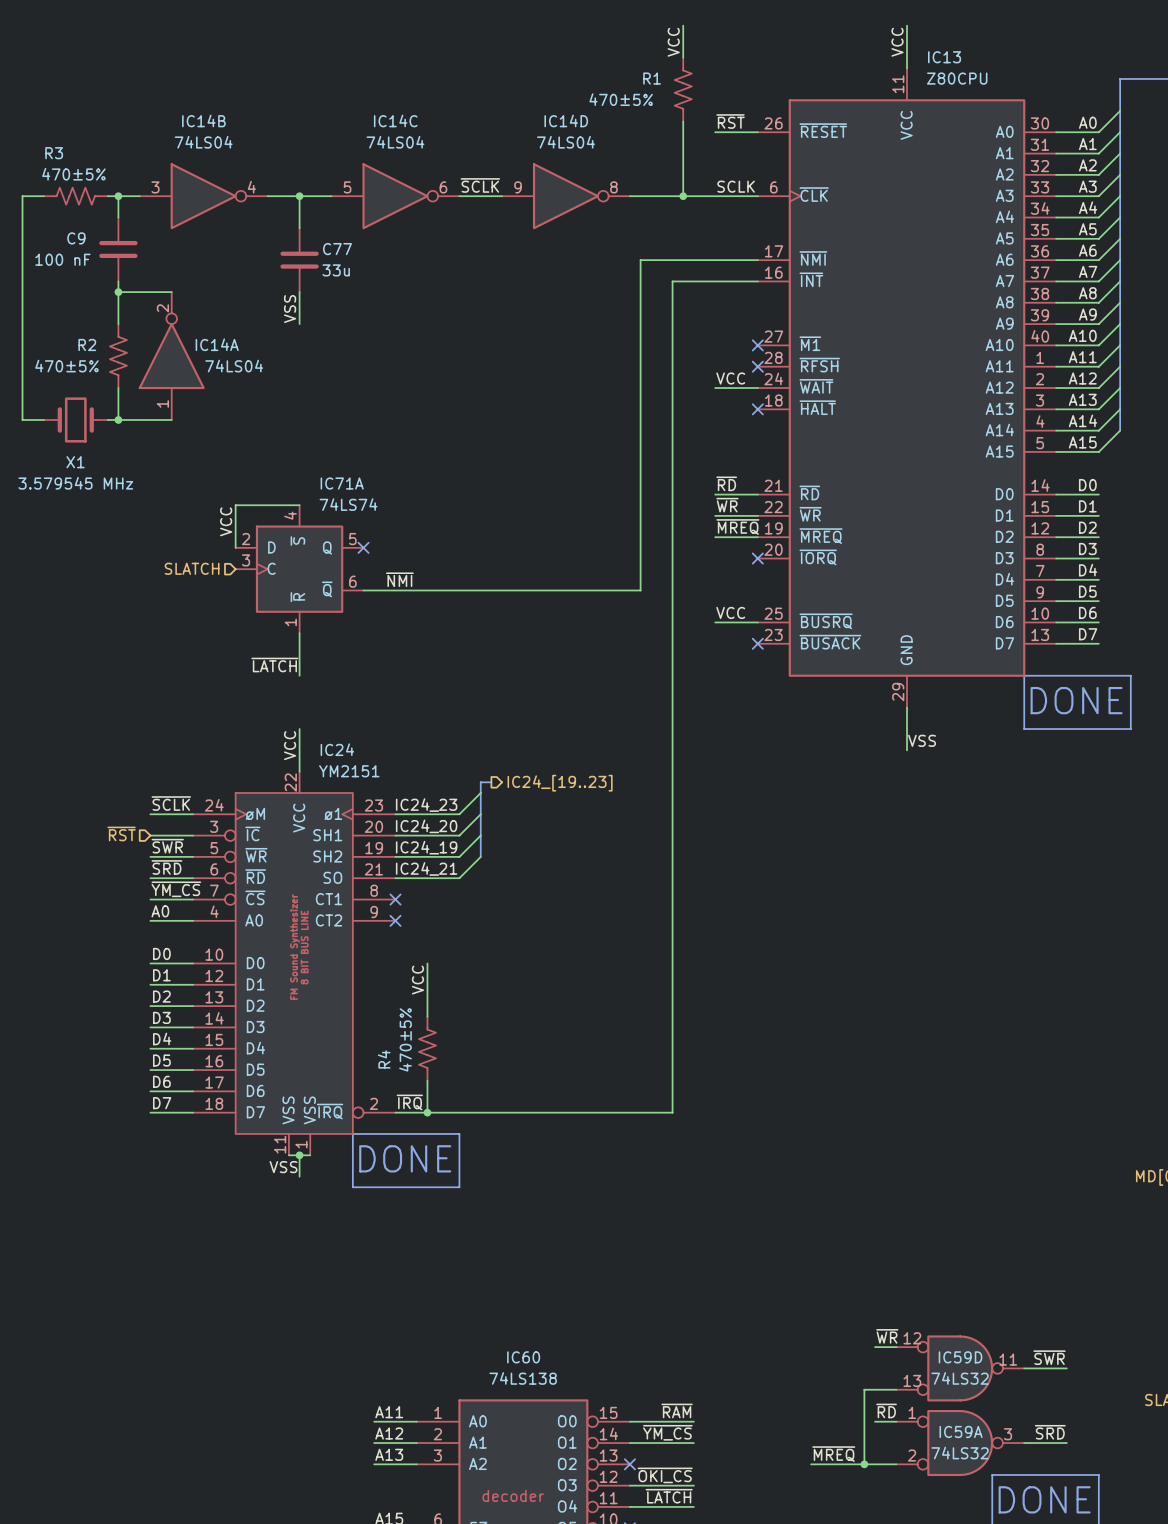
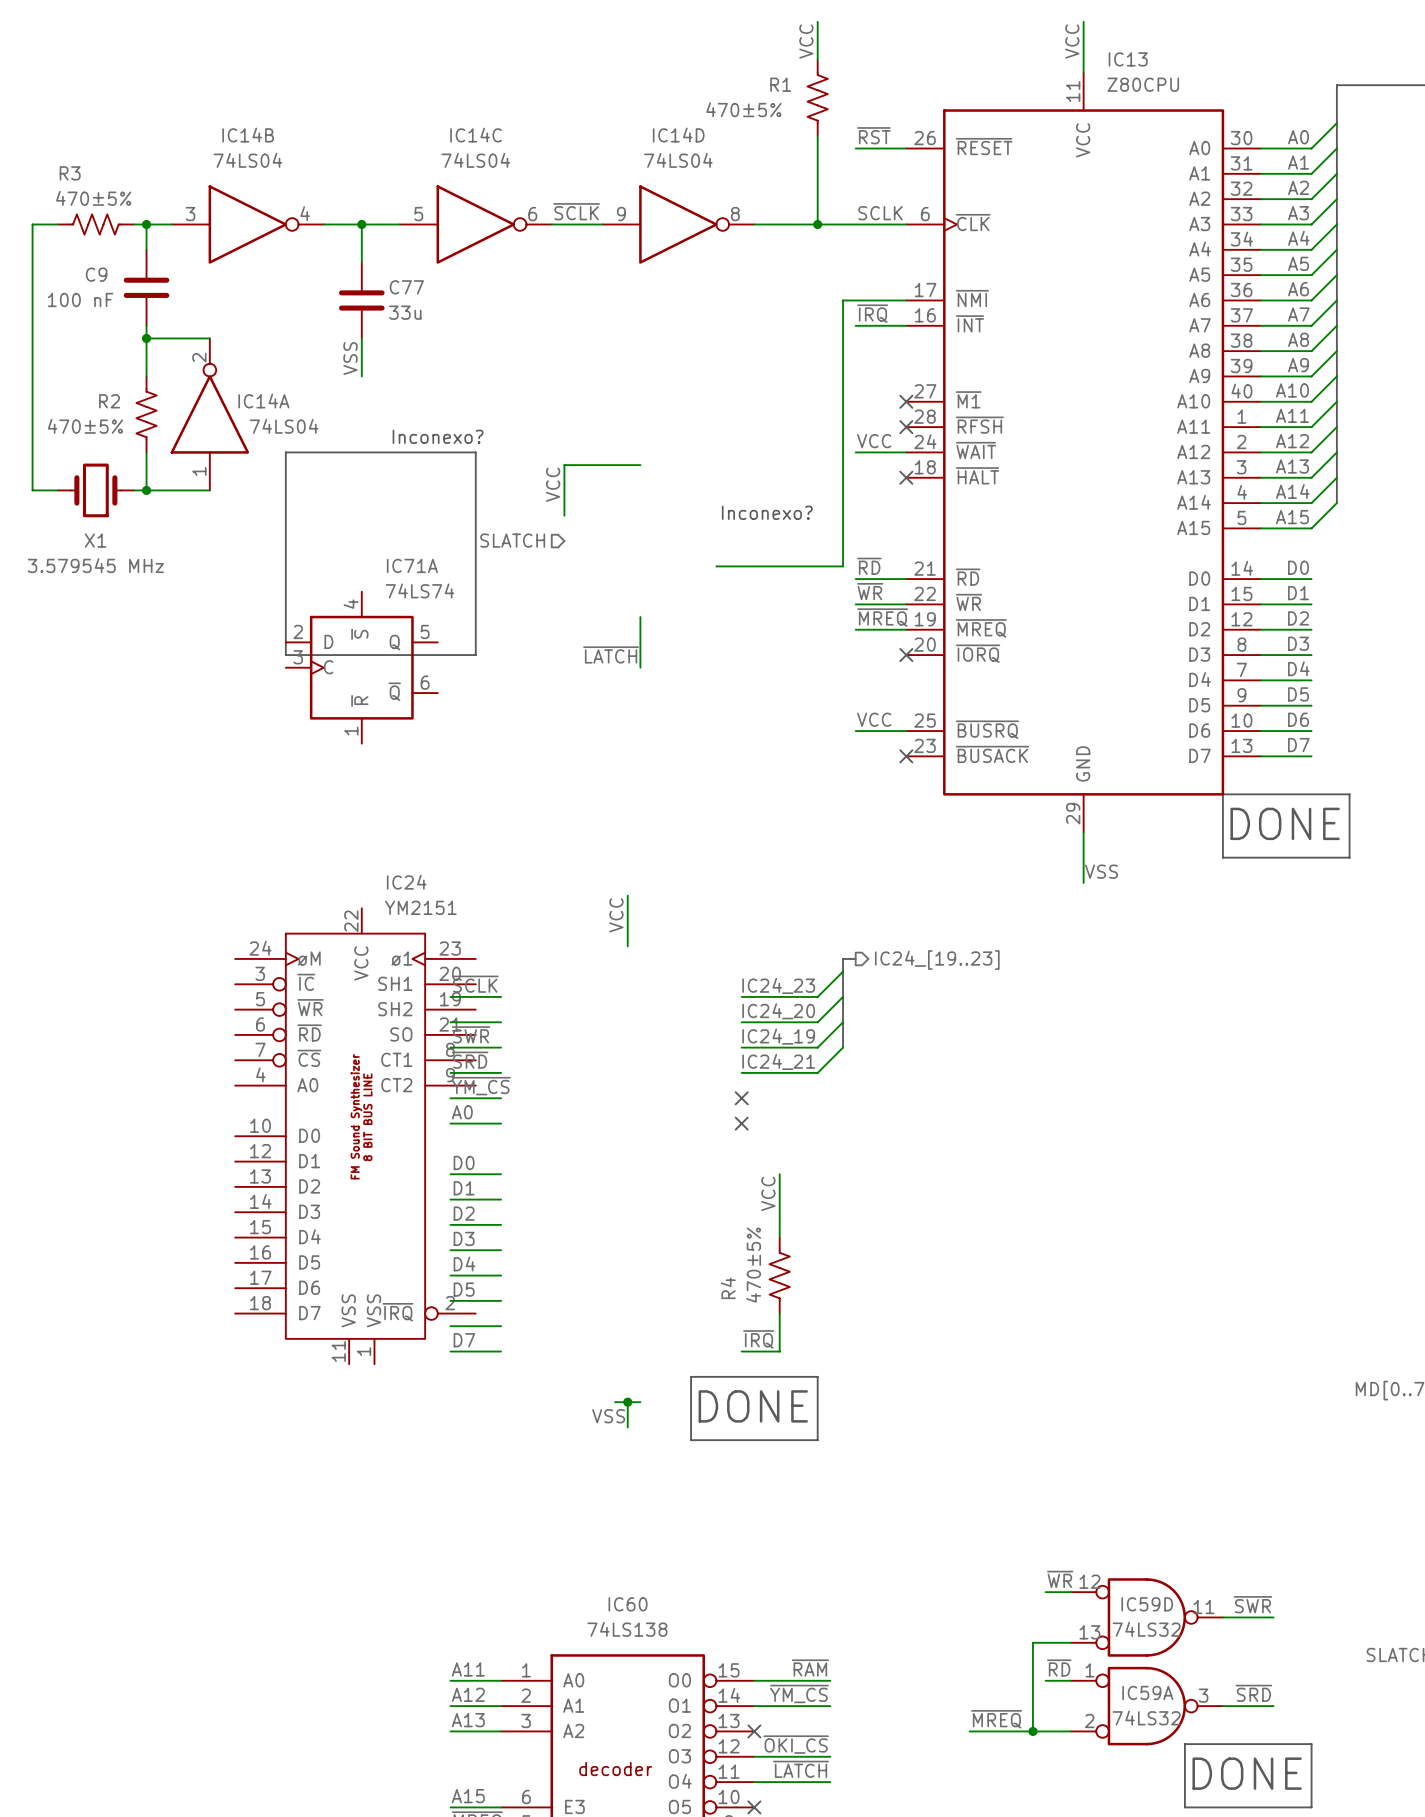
wire: (704, 260) (640, 260) (640, 590) (363, 590) -> (843, 300) (843, 566) (716, 566)
label: none -> ~{IRQ} (872, 313)
wire: (715, 281) (672, 281) (672, 1112) (395, 1112) -> none
text: none -> Inconexo? (438, 436)
line: none -> (285, 452) (475, 452) (475, 655) (285, 655) (285, 452)
wire: none -> (640, 465) (564, 465) (564, 515)
label: none -> VCC (553, 484)
text: none -> Inconexo? (767, 512)
hierarchical label: none -> SLATCH (512, 540)
wire: (299, 505) (235, 505) (235, 547) -> none
label: VCC (226, 521) -> none
wire: none -> (640, 617) (640, 667)
no-connect mark: (363, 547) -> none
label: none -> ~{LATCH} (611, 654)
hierarchical label: SLATCH (192, 568) -> none
label: ~{NMI} (399, 579) -> none
wire: (299, 633) (299, 675) -> none
label: ~{LATCH} (274, 665) -> none
wire: (299, 729) (299, 771) -> none
label: VCC (290, 745) -> none
wire: none -> (627, 895) (627, 946)
label: none -> VCC (616, 915)
bus: (491, 782) (480, 782) (480, 856) -> none
hierarchical label: IC24_[19..23] (560, 783) -> none
wire: (480, 792) (459, 814) (395, 814) -> none
label: ~{SCLK} (171, 803) -> none
label: IC24_23 (426, 805) -> none
wire: (150, 814) (193, 814) -> none
wire: (480, 814) (459, 835) (395, 835) -> none
bus: none -> (855, 958) (843, 958) (843, 1047)
hierarchical label: none -> IC24_[19..23] (937, 960)
wire: none -> (843, 971) (817, 996) (741, 996)
label: IC24_20 (426, 826) -> none
hierarchical label: ~{RST} (121, 833) -> none
wire: (150, 835) (193, 835) -> none
label: none -> ~{SCLK} (475, 984)
wire: (480, 835) (459, 856) (395, 856) -> none
label: none -> IC24_23 (778, 985)
label: ~{SWR} (167, 846) -> none
wire: none -> (450, 996) (501, 996)
wire: none -> (843, 996) (817, 1022) (741, 1022)
label: IC24_19 (426, 847) -> none
wire: (150, 856) (193, 856) -> none
wire: (480, 856) (459, 878) (395, 878) -> none
label: none -> IC24_20 (778, 1011)
label: ~{SRD} (166, 867) -> none
wire: none -> (450, 1022) (501, 1022)
wire: none -> (843, 1022) (817, 1047) (741, 1047)
label: IC24_21 (426, 868) -> none
wire: (150, 878) (193, 878) -> none
label: none -> ~{SWR} (471, 1034)
label: none -> IC24_19 (778, 1036)
wire: none -> (450, 1047) (501, 1047)
wire: none -> (843, 1047) (817, 1072) (741, 1072)
label: ~{YM_CS} (176, 889) -> none
wire: (150, 899) (193, 899) -> none
label: none -> ~{SRD} (470, 1060)
no-connect mark: (395, 899) -> none
label: none -> IC24_21 (778, 1061)
wire: none -> (450, 1072) (501, 1072)
label: A0 (160, 911) -> none
wire: (150, 920) (193, 920) -> none
no-connect mark: (395, 920) -> none
label: none -> ~{YM_CS} (481, 1086)
wire: none -> (450, 1098) (501, 1098)
no-connect mark: none -> (741, 1098)
label: none -> A0 (462, 1112)
wire: none -> (450, 1123) (501, 1123)
no-connect mark: none -> (741, 1123)
label: D0 (161, 953) -> none
wire: (150, 963) (193, 963) -> none
wire: (427, 963) (427, 1016) -> none
label: D1 (161, 975) -> none
label: VCC (417, 980) -> none
wire: (150, 984) (193, 984) -> none
label: none -> D0 (464, 1162)
wire: none -> (450, 1174) (501, 1174)
wire: none -> (779, 1174) (779, 1237)
label: D2 (161, 996) -> none
wire: (150, 1006) (193, 1006) -> none
label: none -> D1 (464, 1188)
label: none -> VCC (768, 1193)
wire: none -> (450, 1199) (501, 1199)
label: D3 (161, 1017) -> none
wire: (150, 1027) (193, 1027) -> none
label: none -> D2 (464, 1213)
label: D4 (162, 1038) -> none
wire: none -> (450, 1224) (501, 1224)
wire: (150, 1048) (193, 1048) -> none
R4 position: (427, 1048) -> (779, 1275)
label: none -> D3 (464, 1238)
wire: none -> (450, 1250) (501, 1250)
label: D5 (161, 1060) -> none
wire: (150, 1070) (193, 1070) -> none
label: none -> D4 (464, 1263)
wire: none -> (450, 1275) (501, 1275)
wire: (427, 1080) (427, 1112) -> none
label: D6 (161, 1081) -> none
wire: (150, 1091) (193, 1091) -> none
label: none -> D5 (464, 1289)
wire: none -> (450, 1300) (501, 1300)
label: ~{IRQ} (409, 1102) -> none
label: D7 (162, 1103) -> none
wire: (150, 1112) (193, 1112) -> none
junction: (427, 1112) -> none
wire: none -> (779, 1313) (779, 1351) (741, 1351)
wire: none -> (450, 1326) (501, 1326)
line: (352, 1133) (459, 1133) (459, 1187) (352, 1187) (352, 1133) -> none
label: none -> ~{IRQ} (758, 1339)
label: none -> D7 (464, 1340)
wire: none -> (450, 1351) (501, 1351)
wire: (288, 1155) (310, 1155) -> none
wire: (299, 1155) (299, 1176) -> none
junction: (299, 1155) -> none
text: DONE (405, 1158) -> none
line: none -> (691, 1376) (817, 1376) (817, 1440) (691, 1440) (691, 1376)
label: VSS (283, 1167) -> none
wire: none -> (615, 1402) (640, 1402)
wire: none -> (627, 1402) (627, 1427)
junction: none -> (627, 1402)
text: none -> DONE (753, 1406)
label: none -> VSS (608, 1416)

